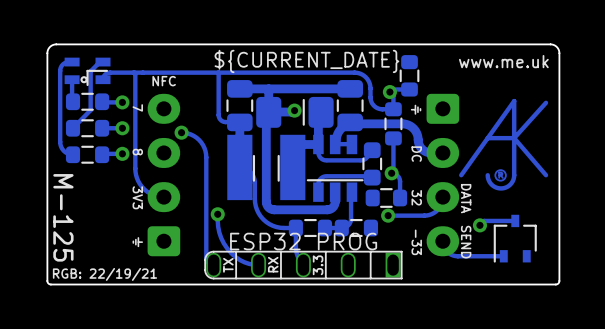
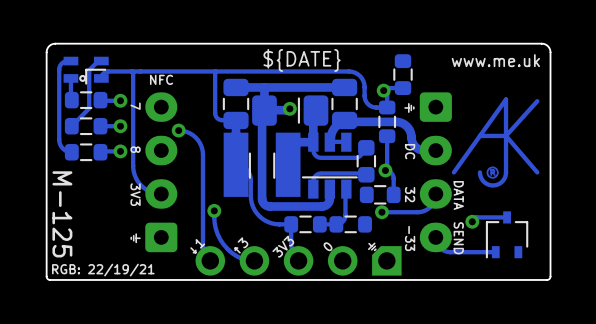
text: ${CURRENT_DATE} (306, 61) -> ${DATE} (302, 60)
part footprint: [204, 250, 403, 280] -> [195, 246, 402, 276]

